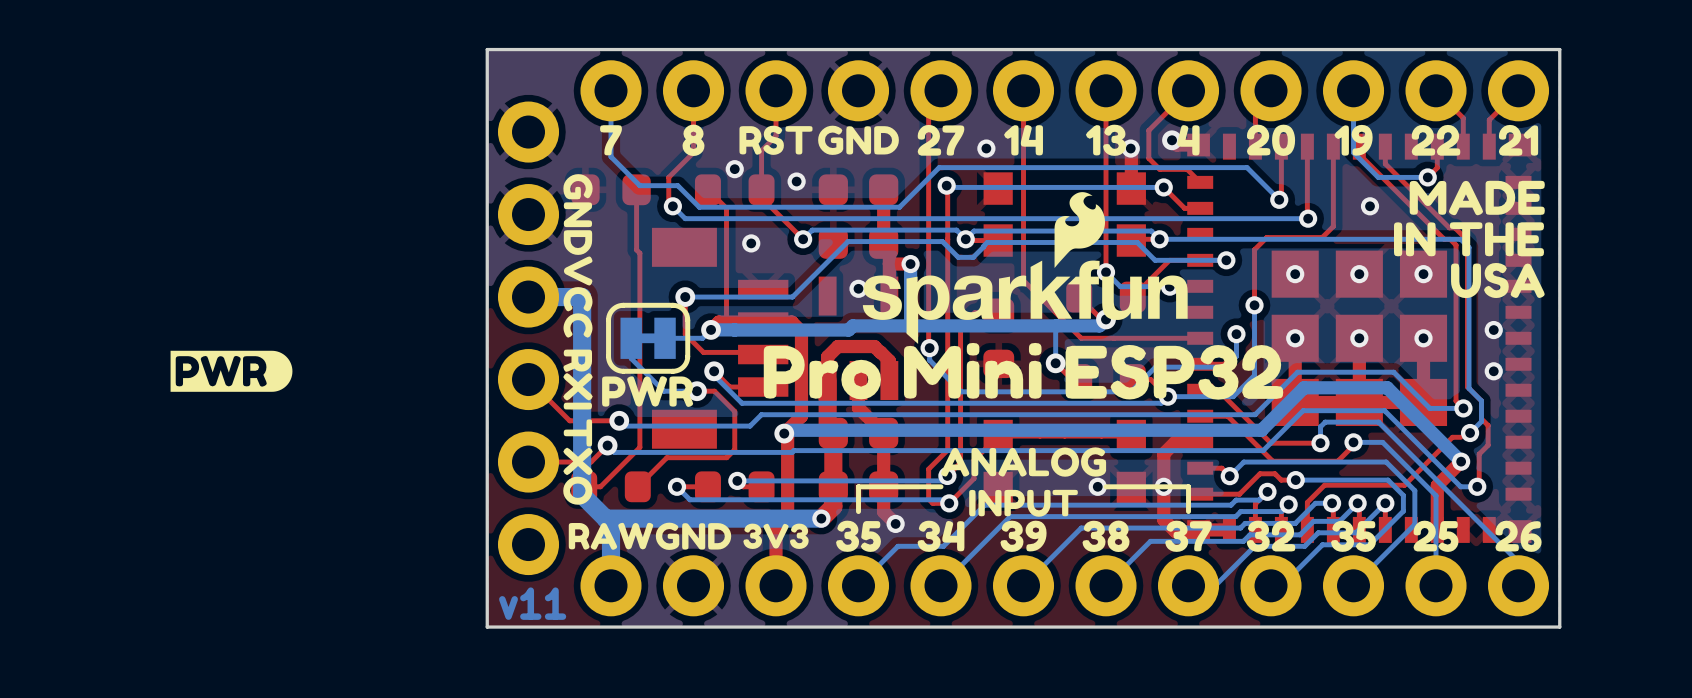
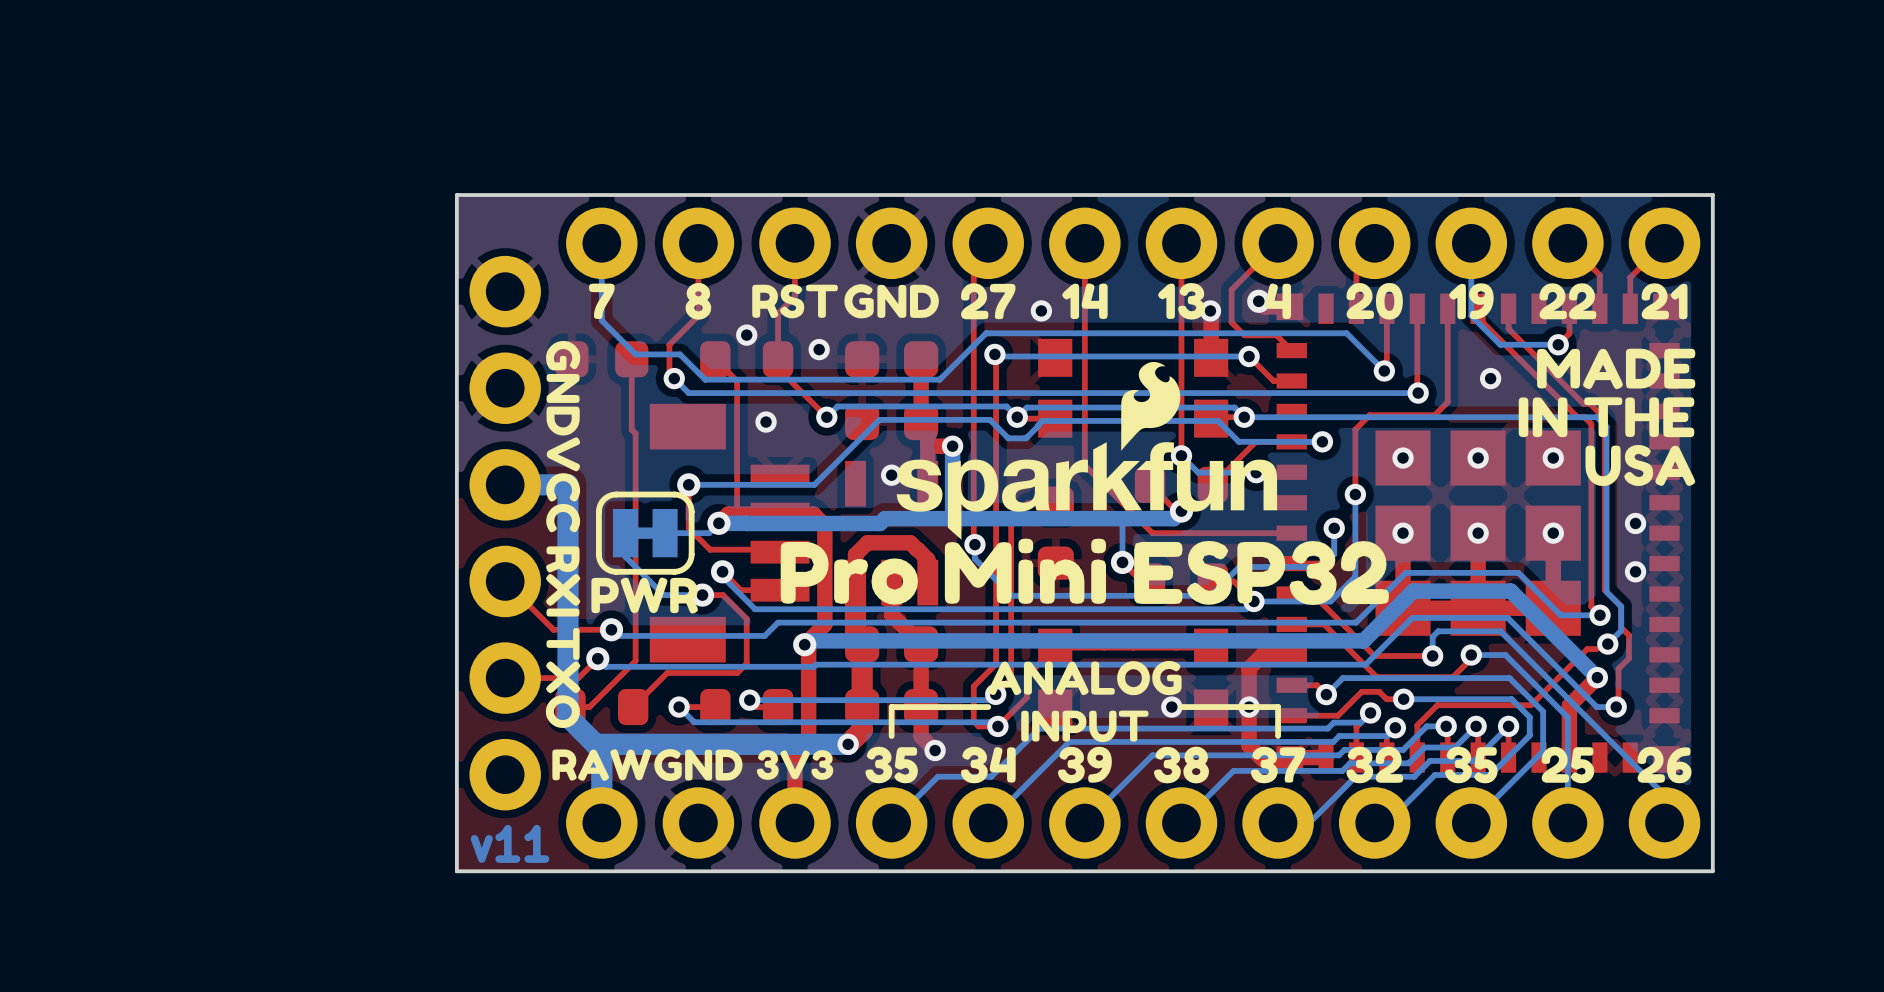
drawing: [170, 350, 293, 392] -> none

